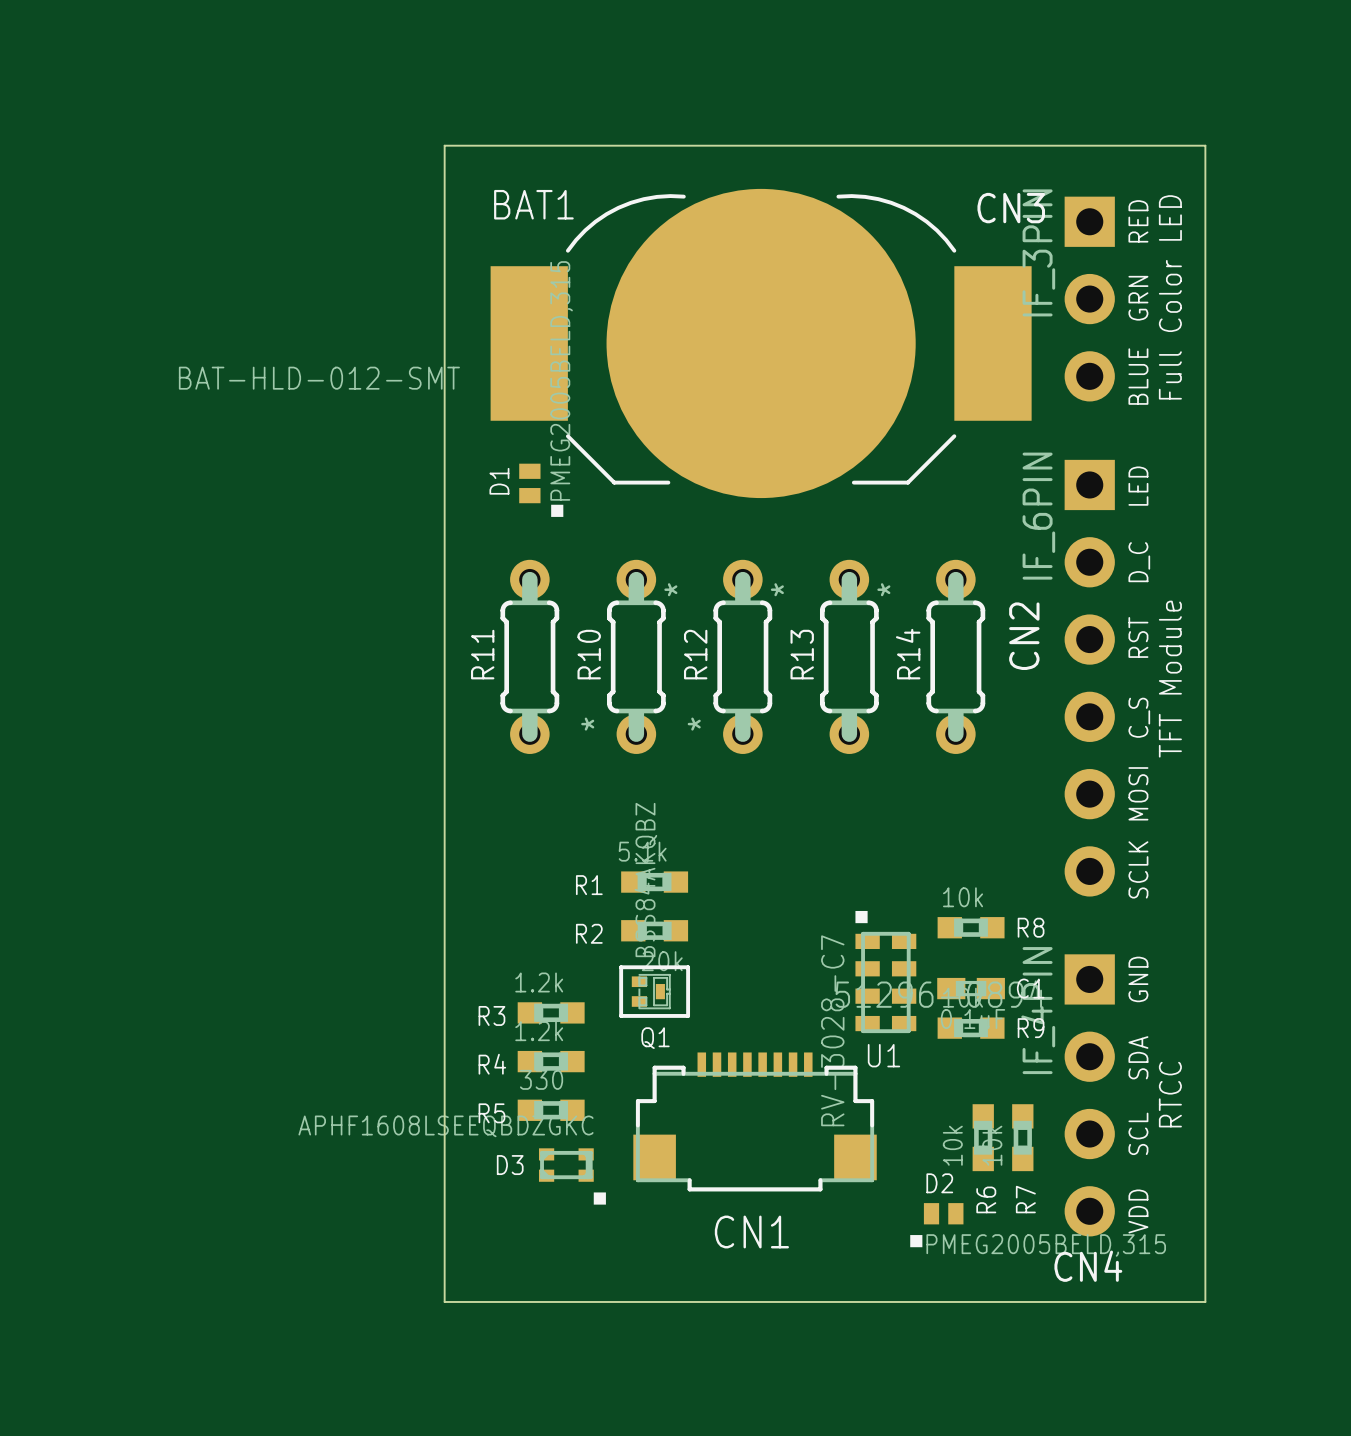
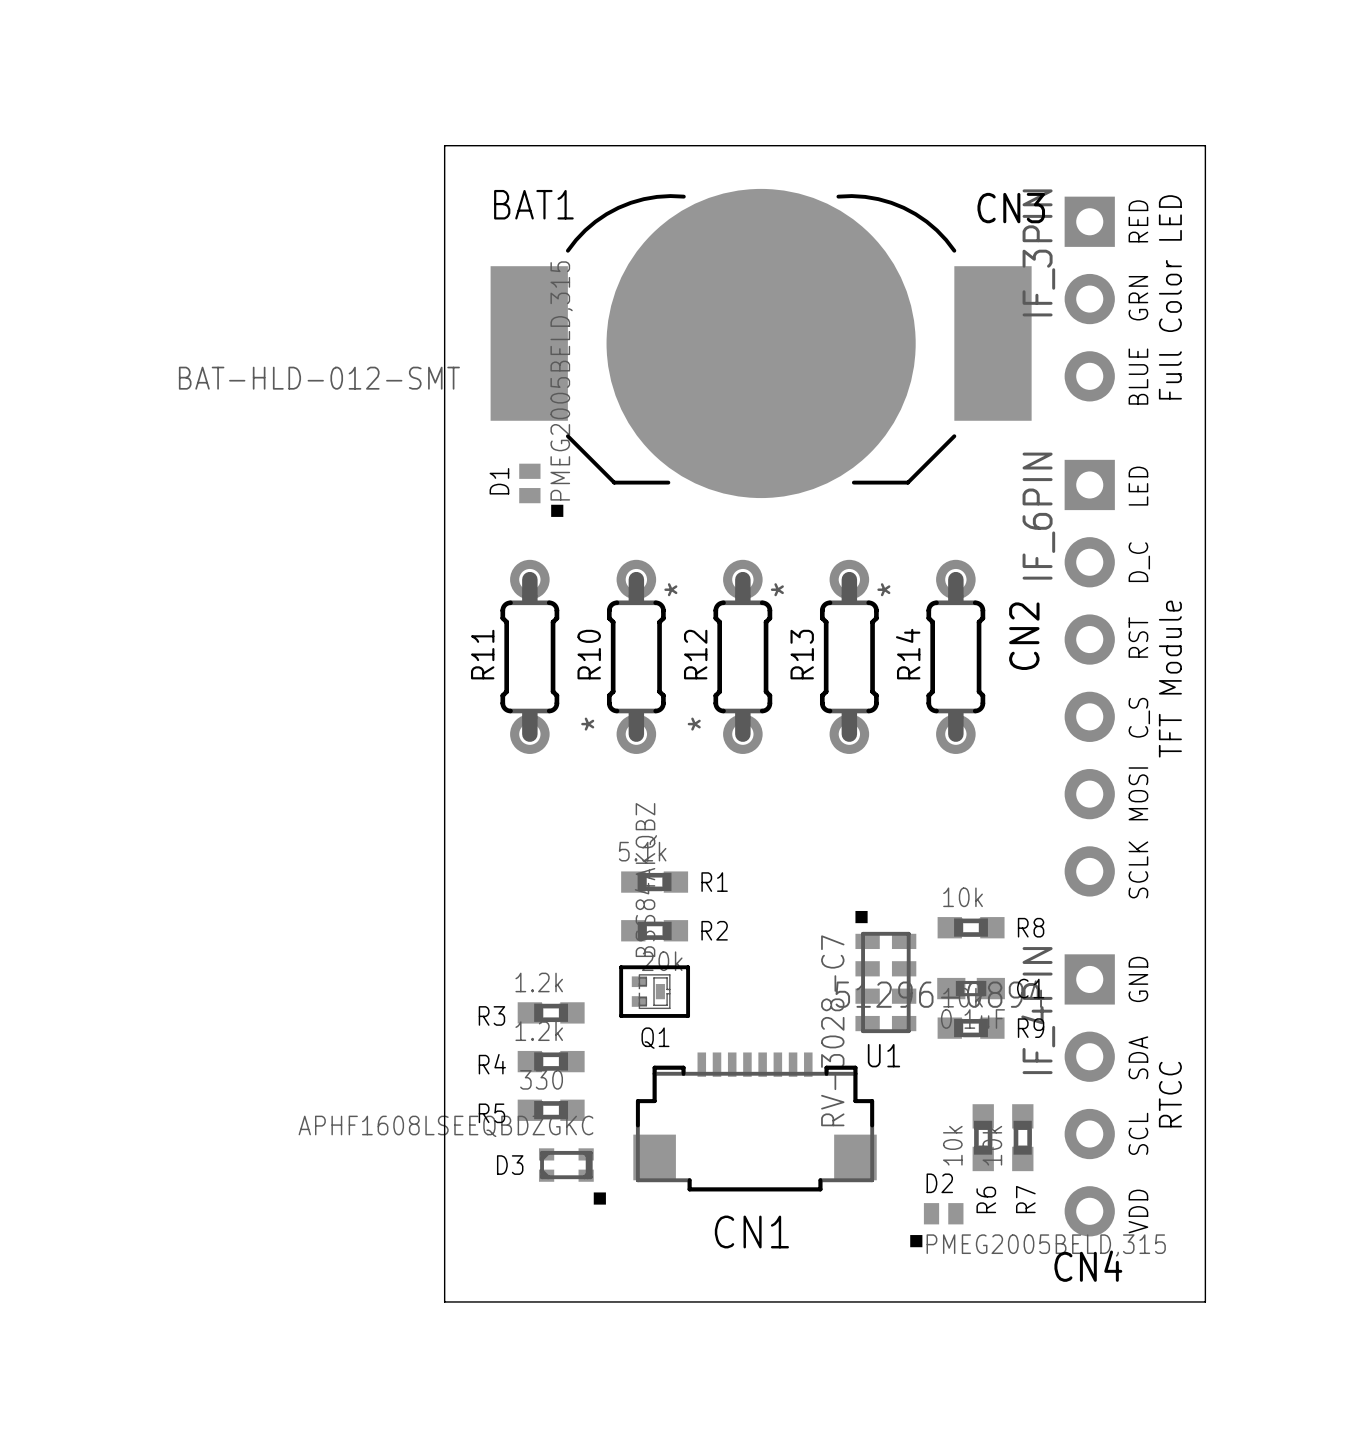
R1 name position: R1 (589, 885) -> R1 (714, 882)
R2 name position: R2 (589, 933) -> R2 (714, 930)

